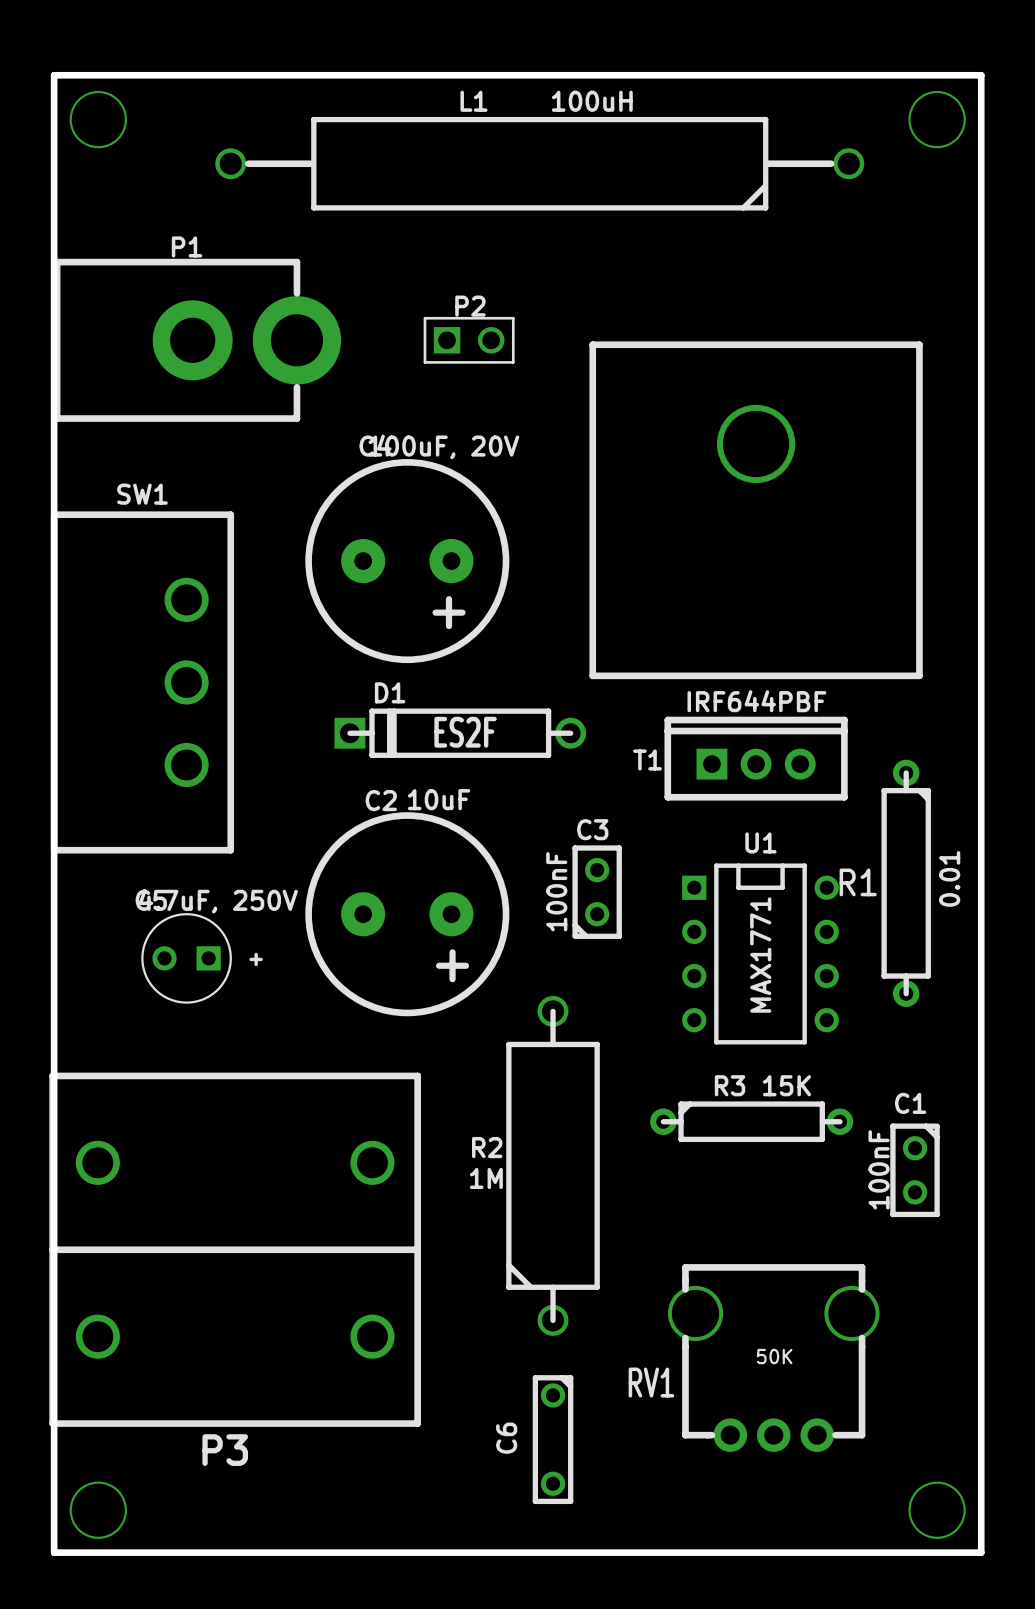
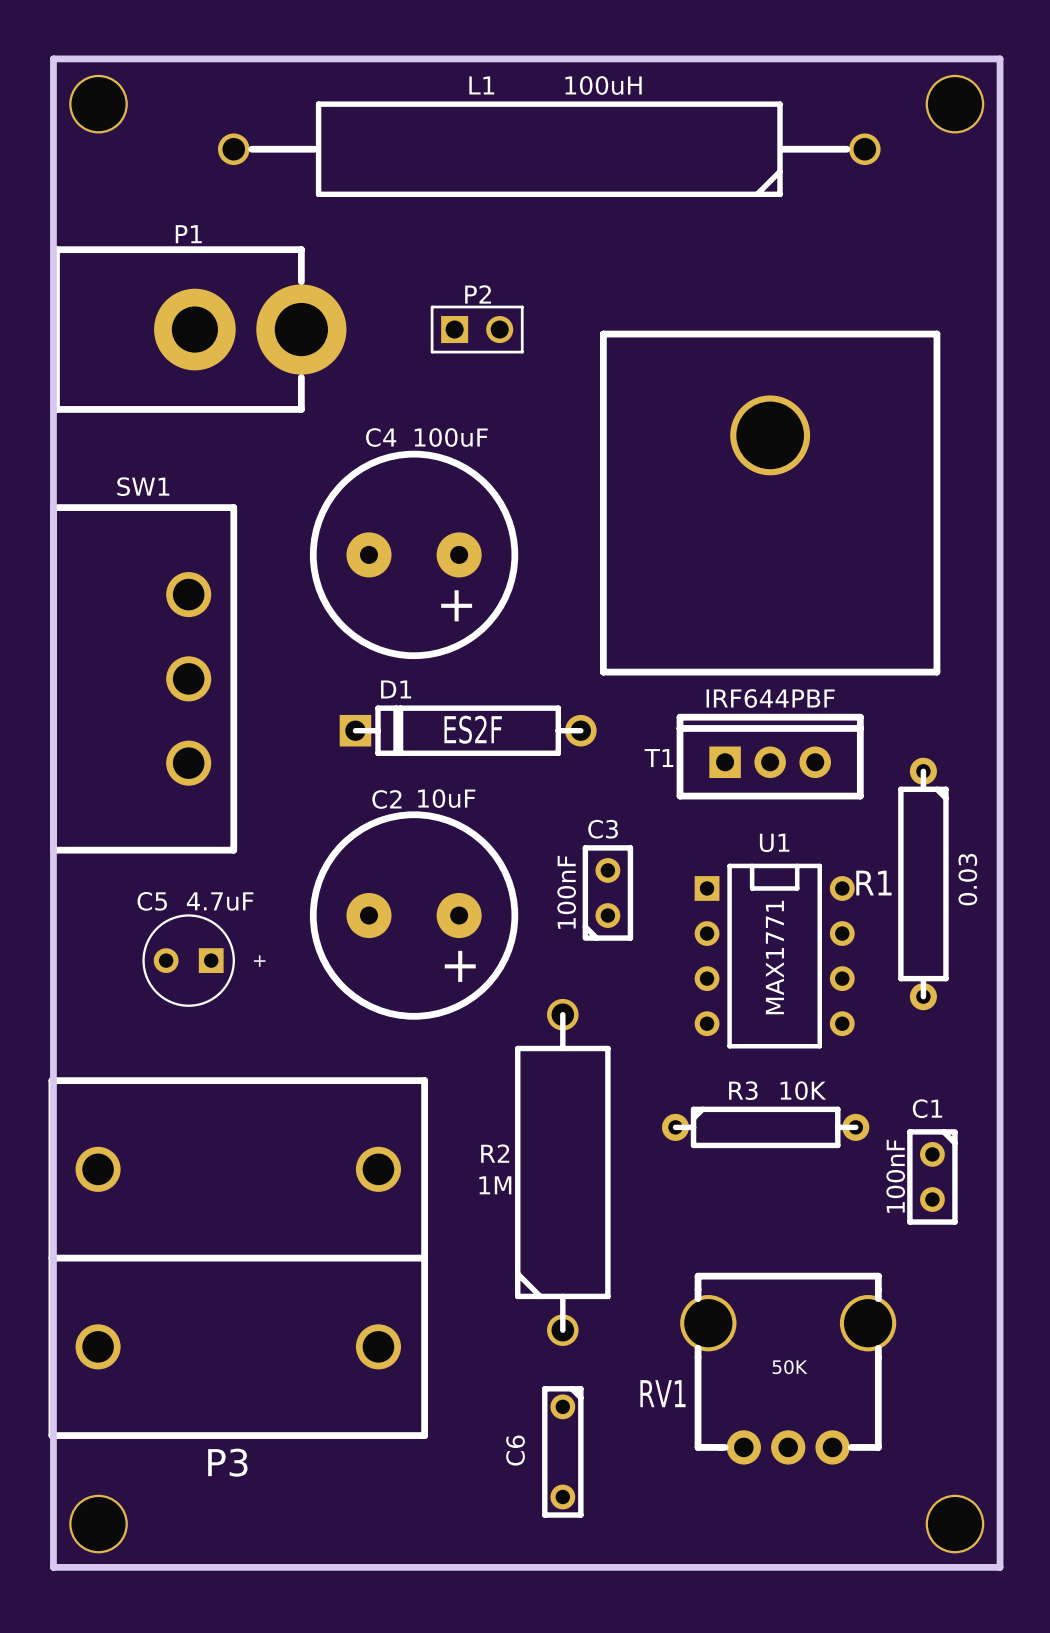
C4 value: 100uF, 20V (443, 447) -> 100uF (451, 437)
R1 value: 0.01 (949, 878) -> 0.03 (967, 879)
C5 value: 4.7uF, 250V (218, 901) -> 4.7uF (220, 901)
R3 value: 15K (786, 1085) -> 10K (803, 1090)

